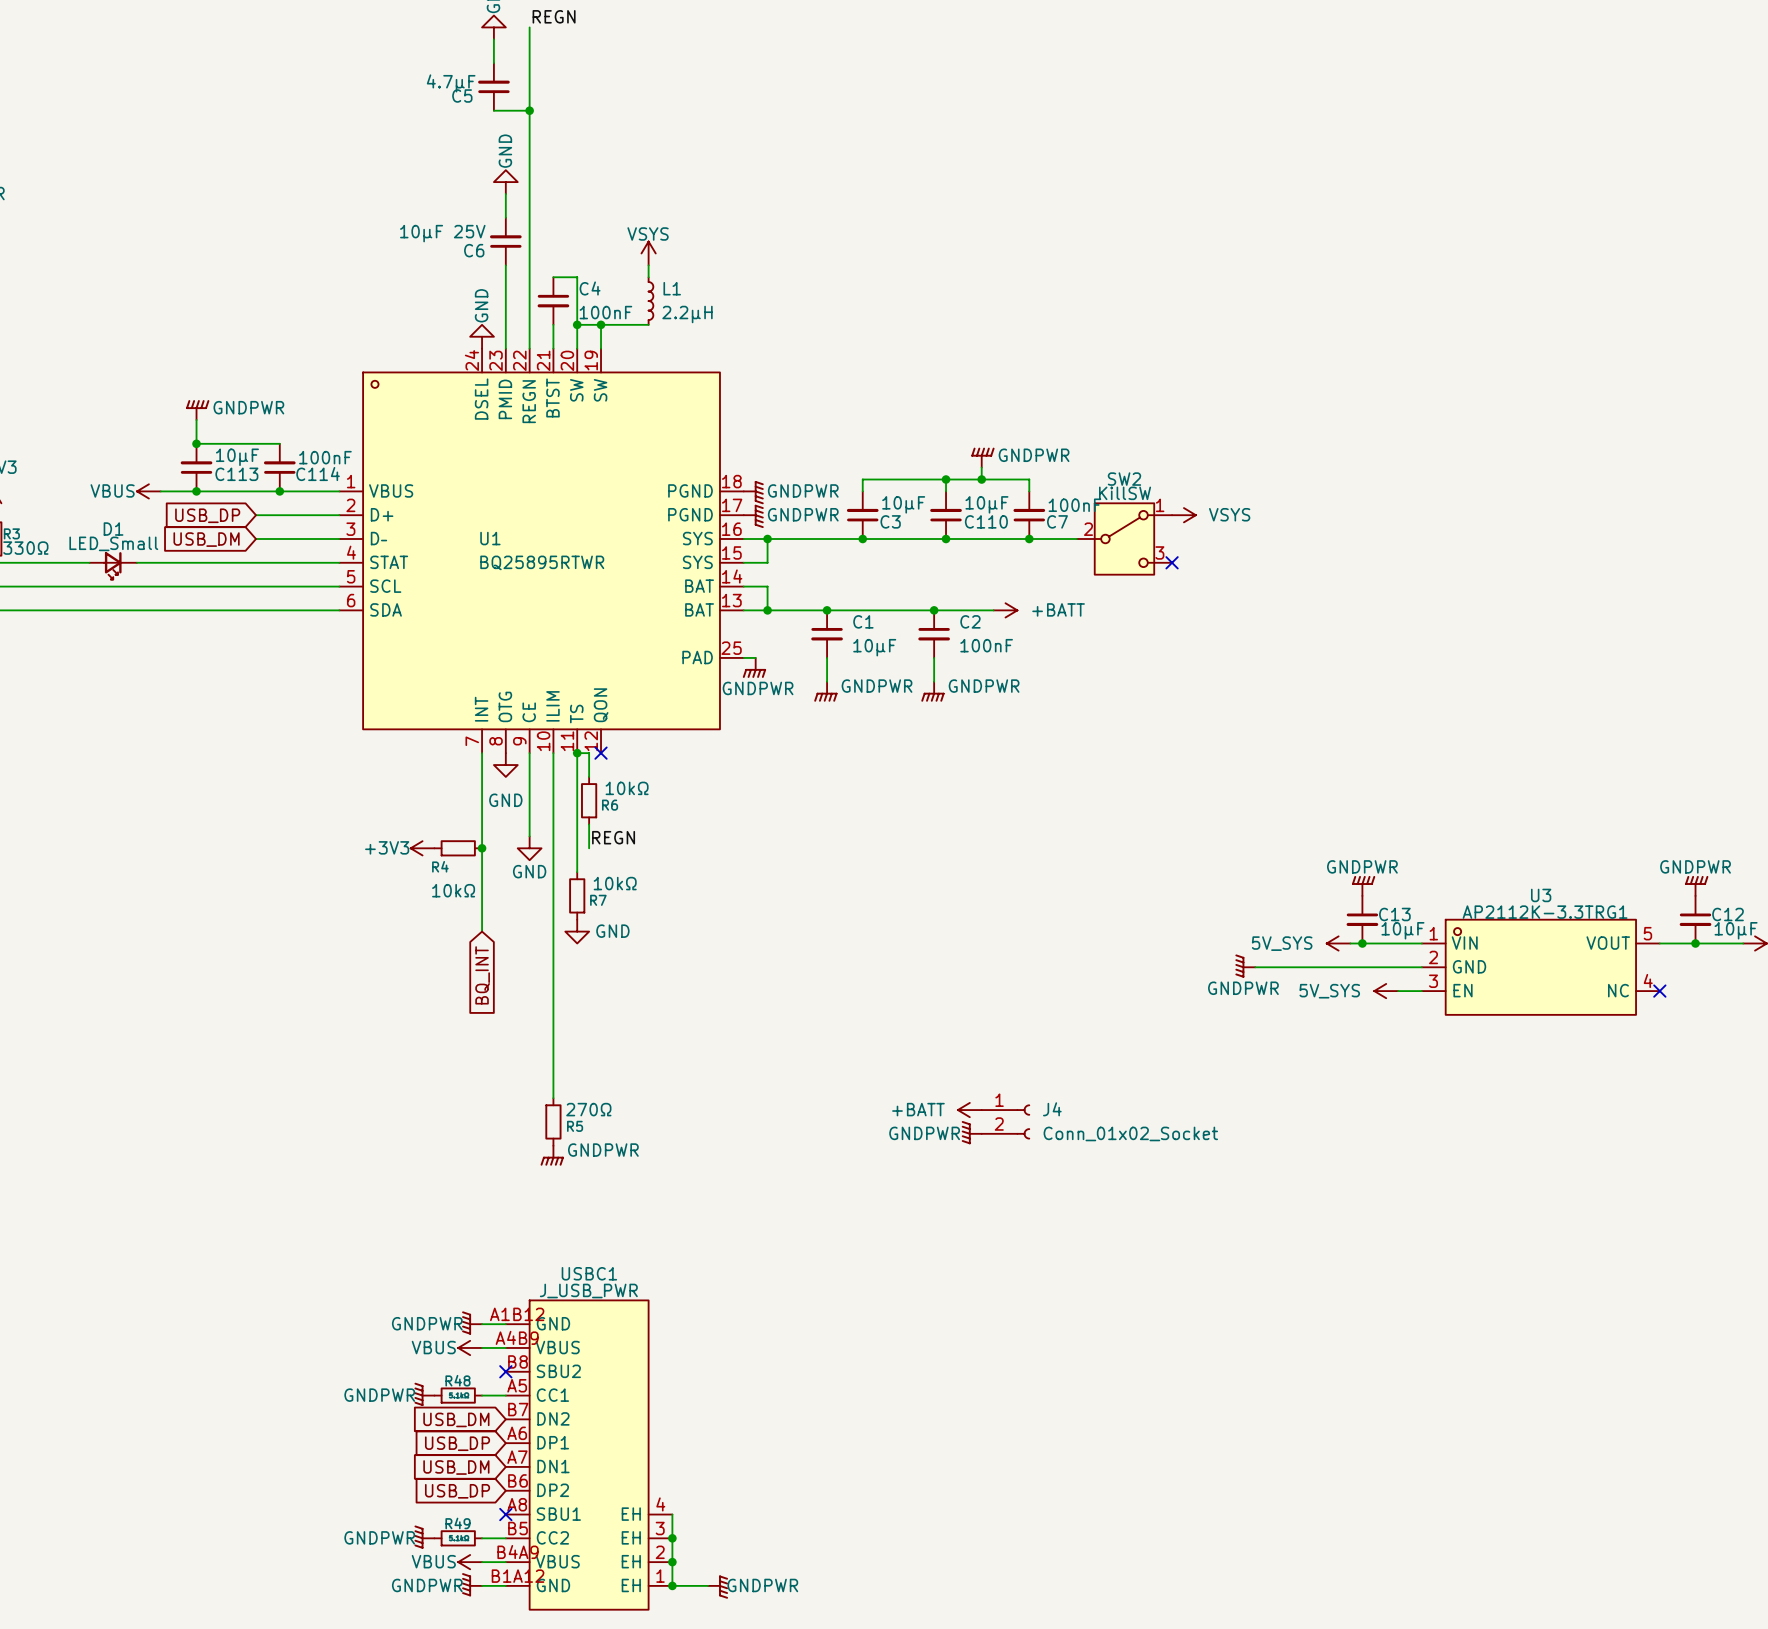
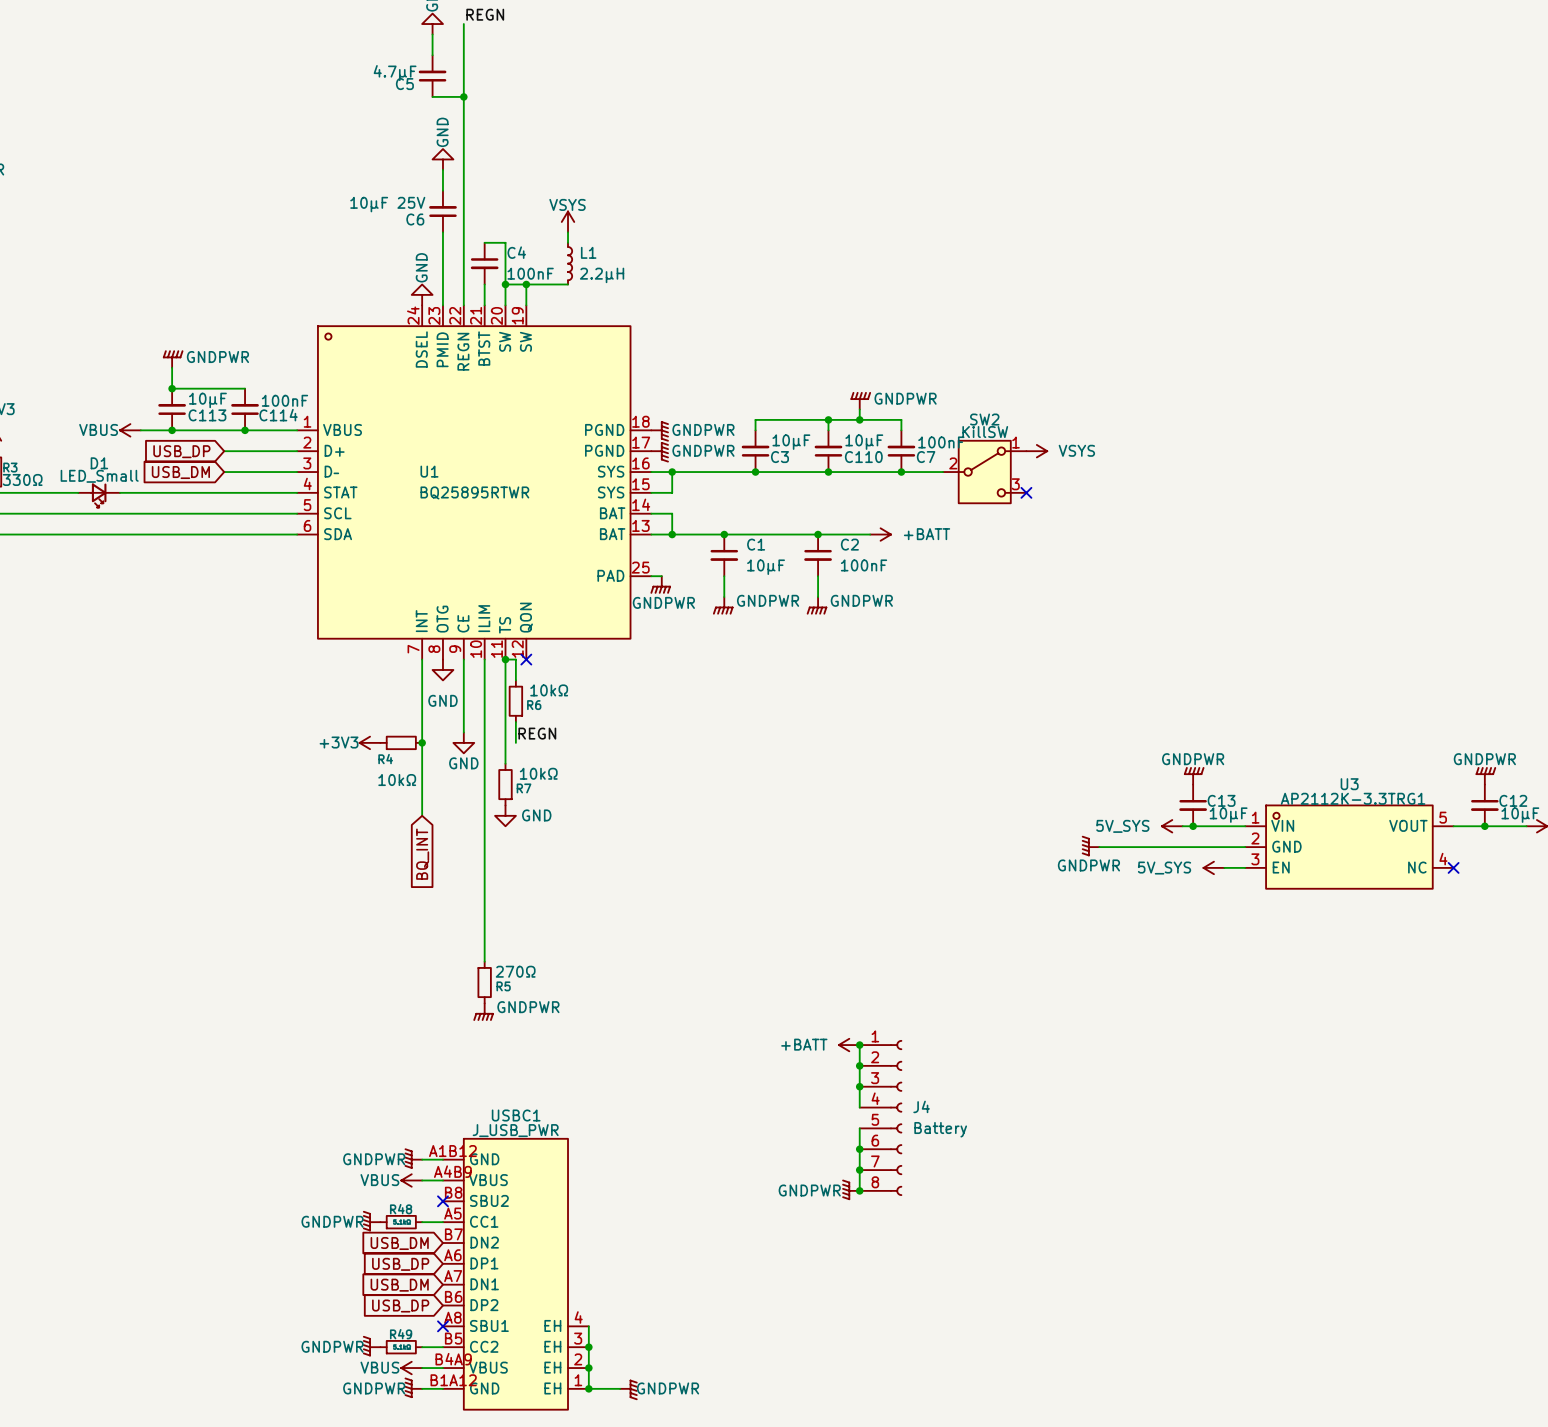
J4 symbol: [981, 1104, 1031, 1140] -> [859, 1040, 903, 1196]
power symbol position: +BATT (969, 1110) -> +BATT (849, 1045)
power symbol position: GNDPWR (971, 1132) -> GNDPWR (850, 1189)
J4 value: Conn_01x02_Socket (1130, 1133) -> Battery (940, 1129)
wire: none -> (859, 1045) (859, 1107)
junction: none -> (859, 1045)
junction: none -> (859, 1065)
junction: none -> (859, 1086)
wire: none -> (859, 1128) (859, 1190)
junction: none -> (859, 1149)
junction: none -> (859, 1170)
junction: none -> (859, 1190)

